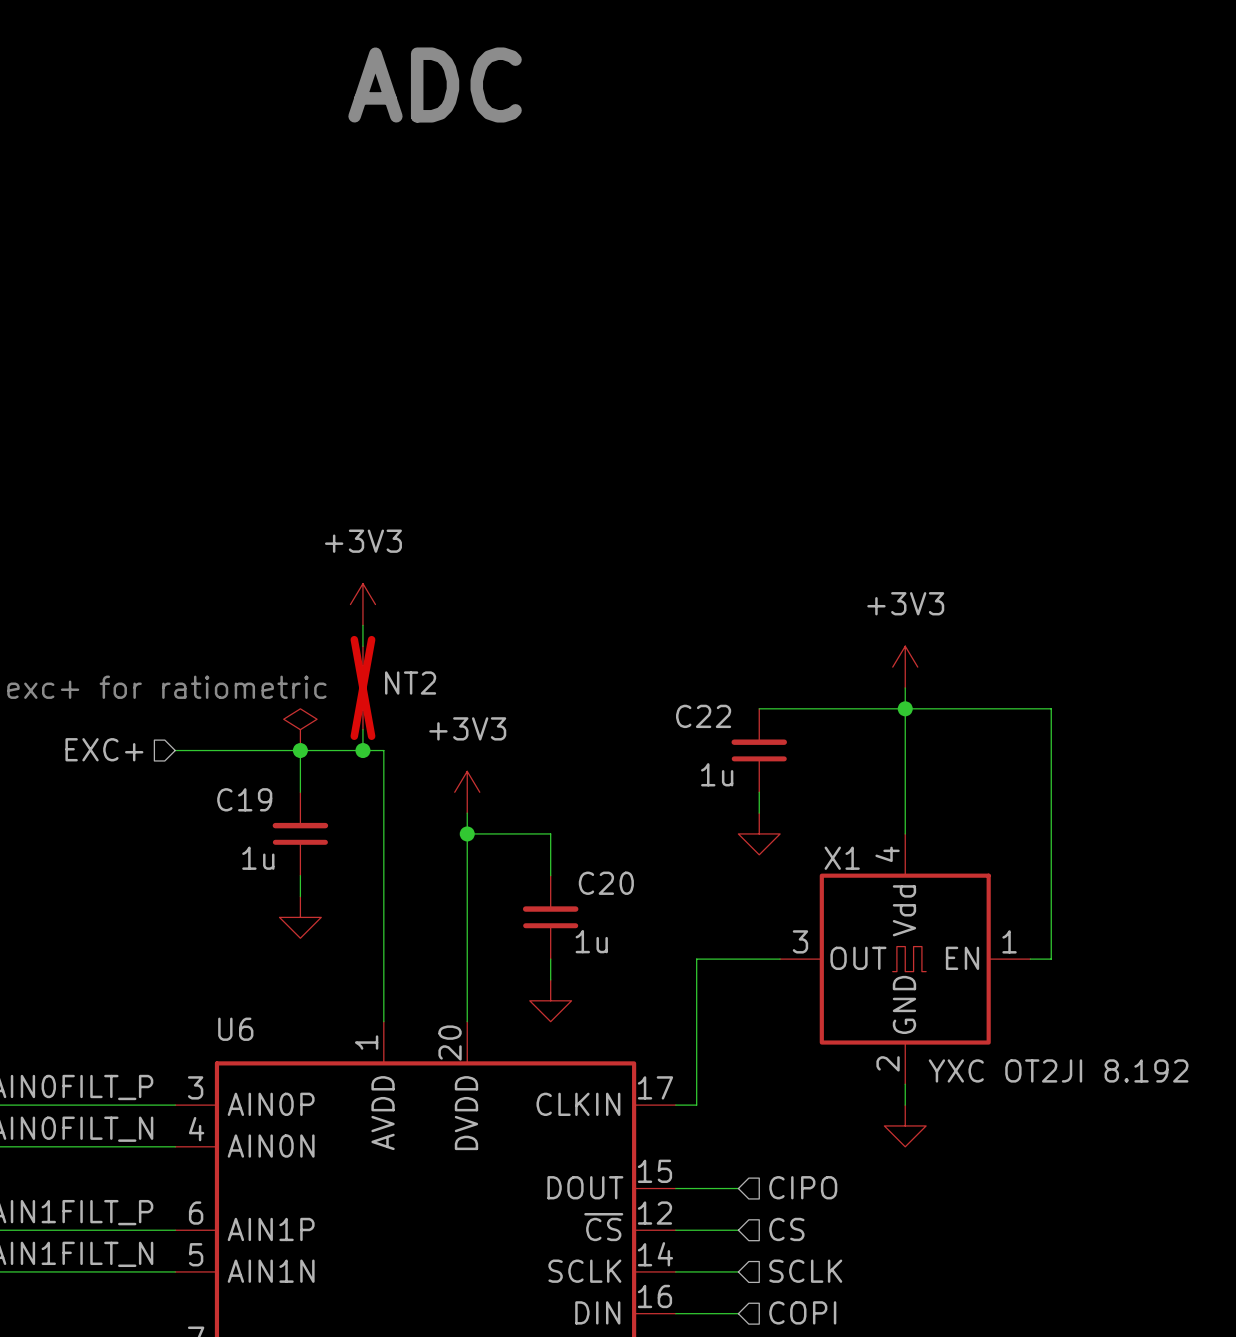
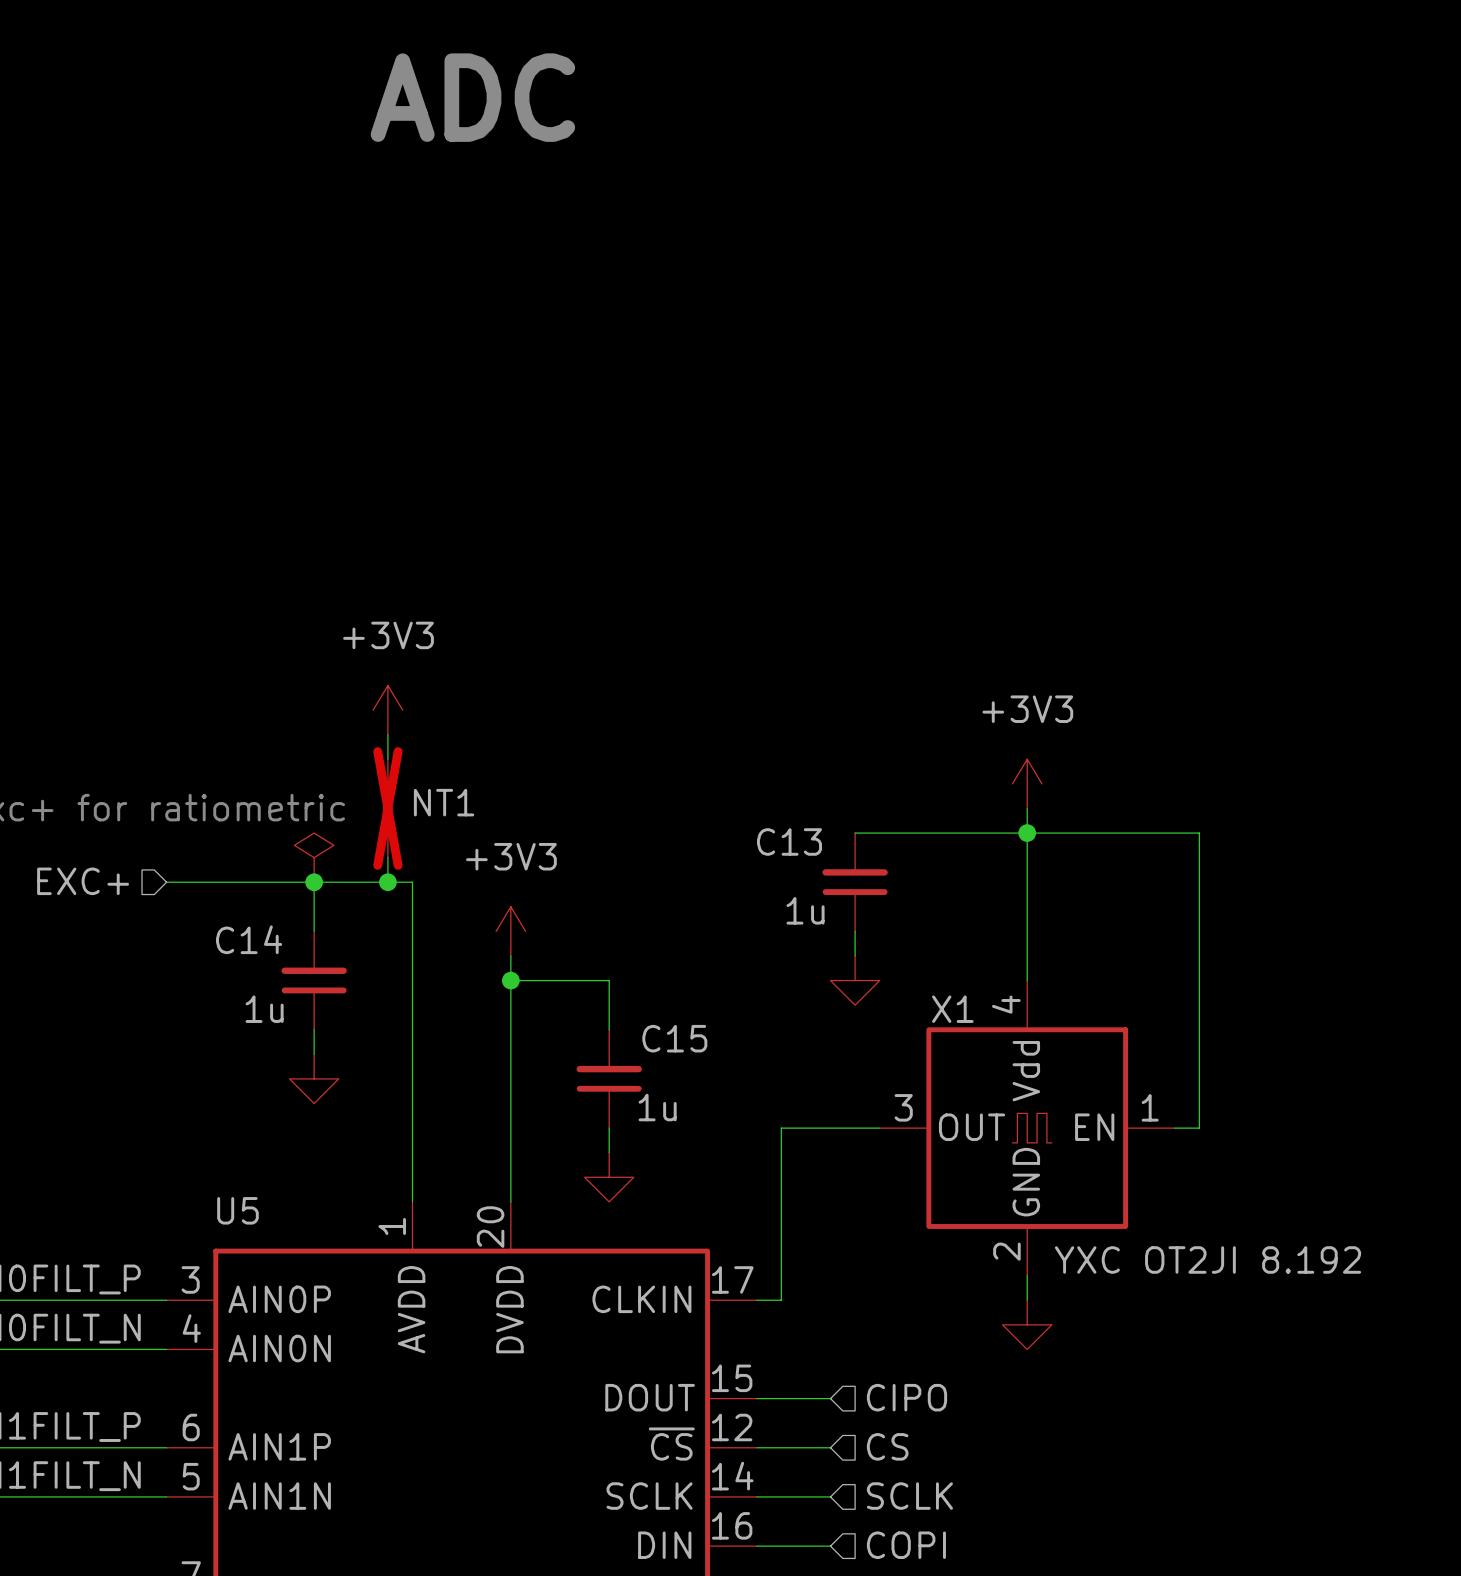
NT2 name: NT2 (410, 683) -> NT1 (444, 802)
C22 name: C22 (703, 716) -> C13 (789, 841)
C19 name: C19 (244, 799) -> C14 (249, 939)
C20 name: C20 (606, 883) -> C15 (674, 1038)
U6 name: U6 (235, 1029) -> U5 (237, 1210)

